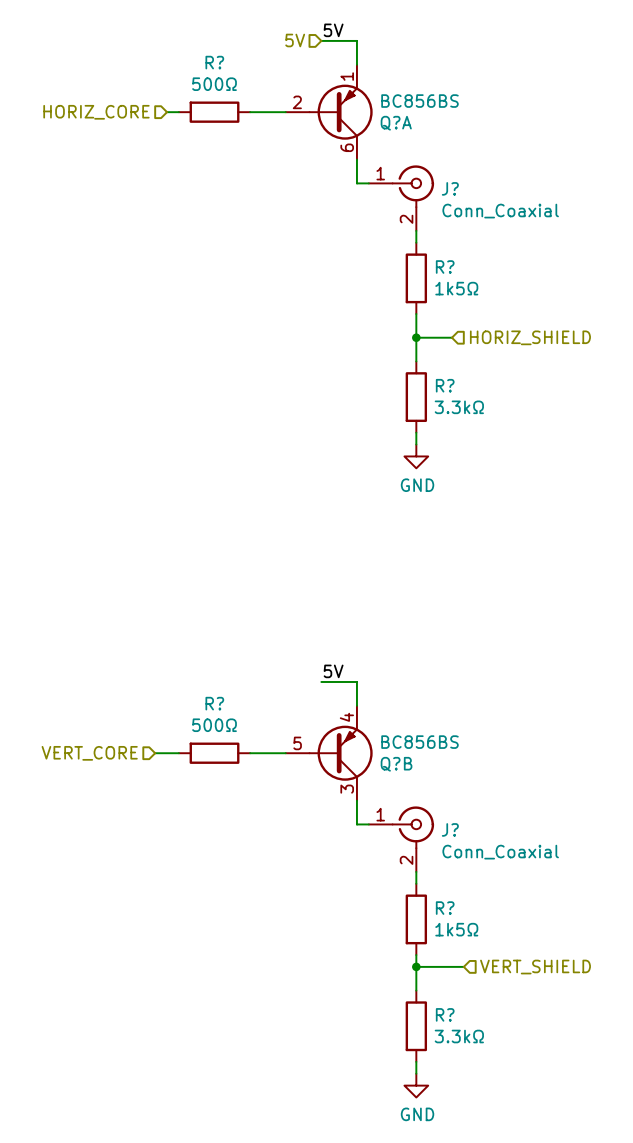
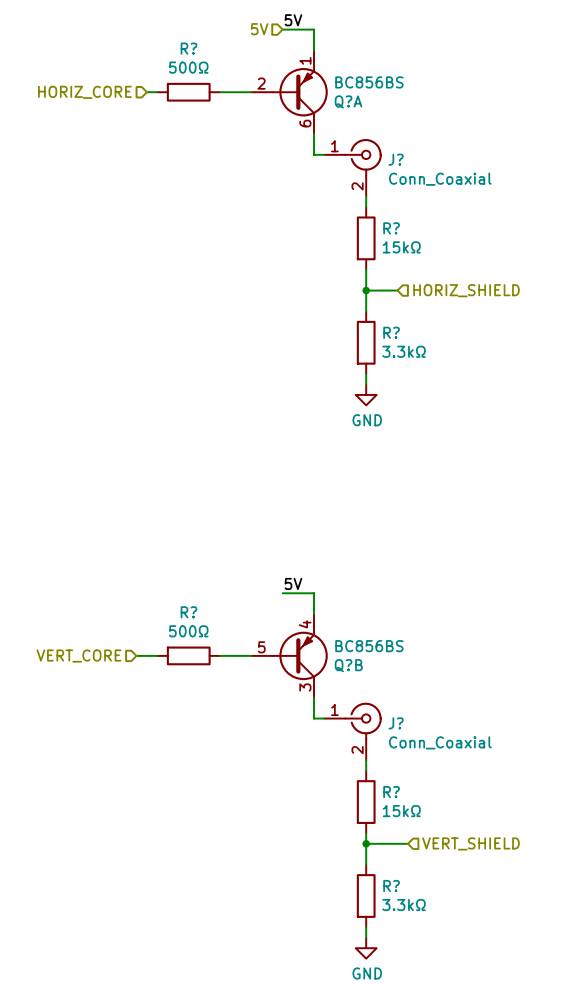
R? value: 1k5Ω (456, 288) -> 15kΩ (401, 247)
R? value: 1k5Ω (456, 929) -> 15kΩ (401, 811)

